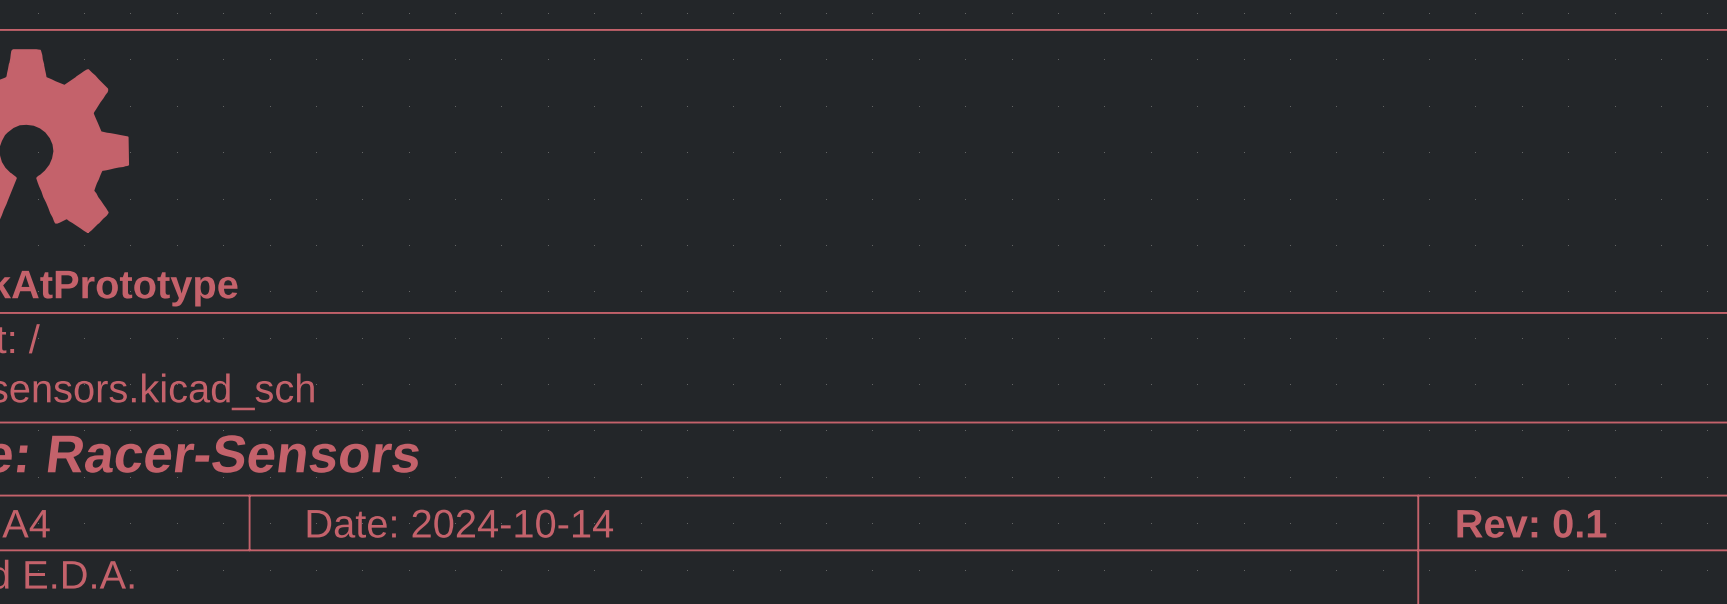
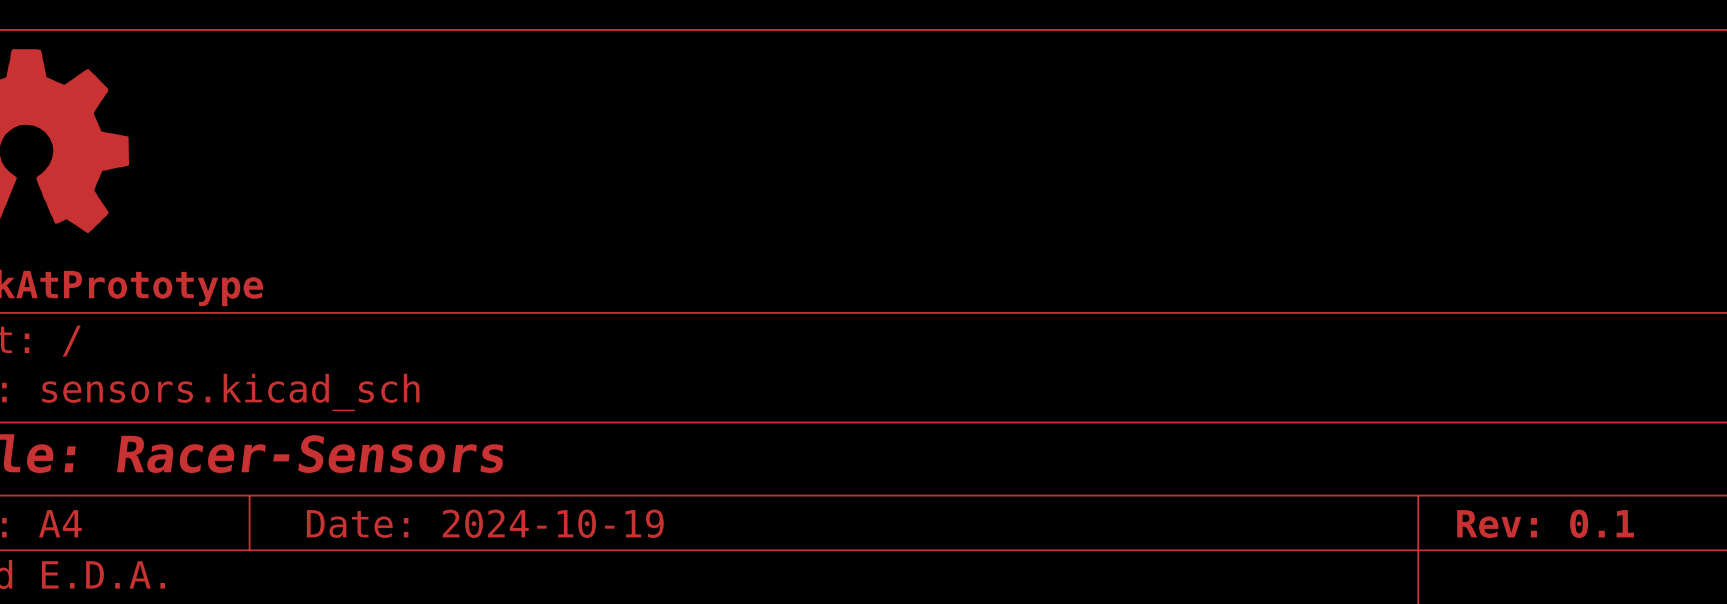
title block: Date: 2024-10-14 (460, 523) -> Date: 2024-10-19 (485, 523)

